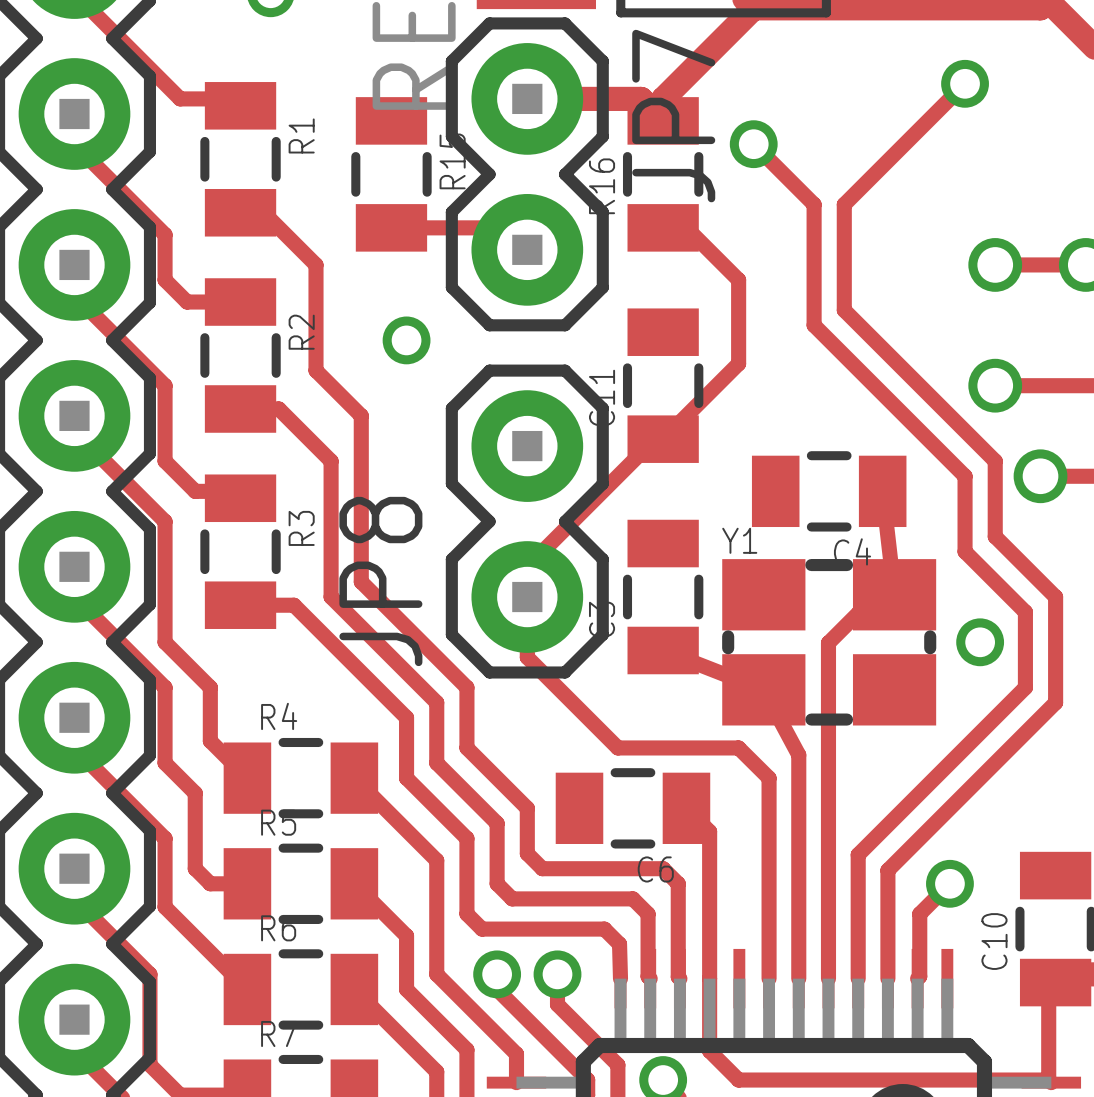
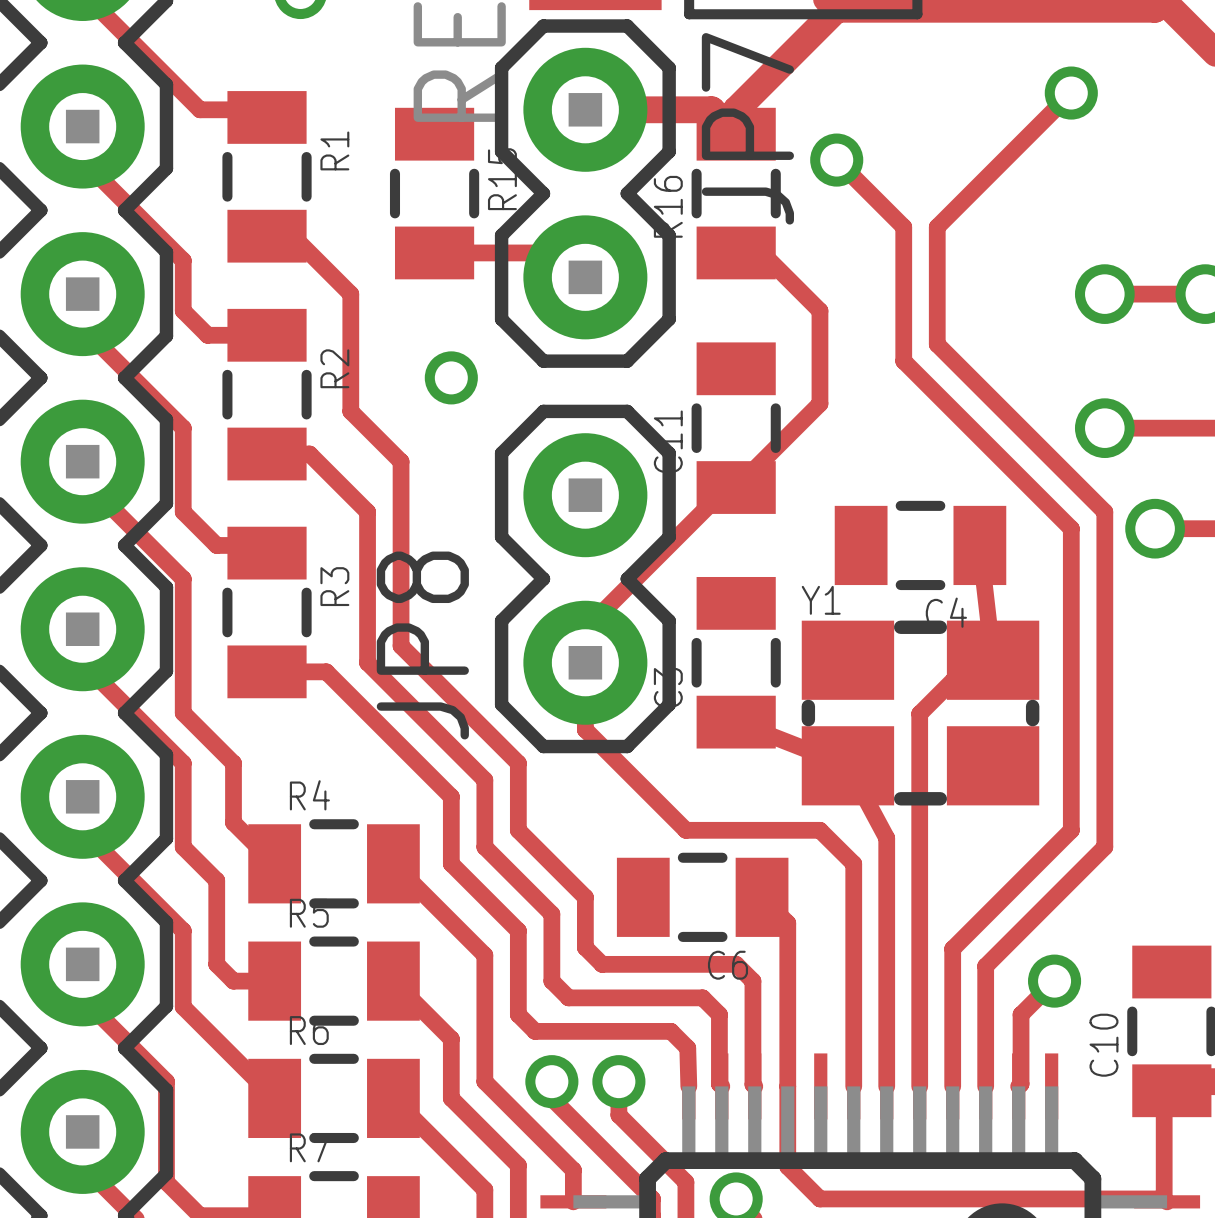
track: (995, 536) (1055, 597) (1055, 702) (995, 763) -> (1104, 595) (1104, 847)
track: (965, 551) (1025, 612) (1025, 687) (965, 747) -> (1071, 612) (1071, 830)
via: (980, 642) -> none

